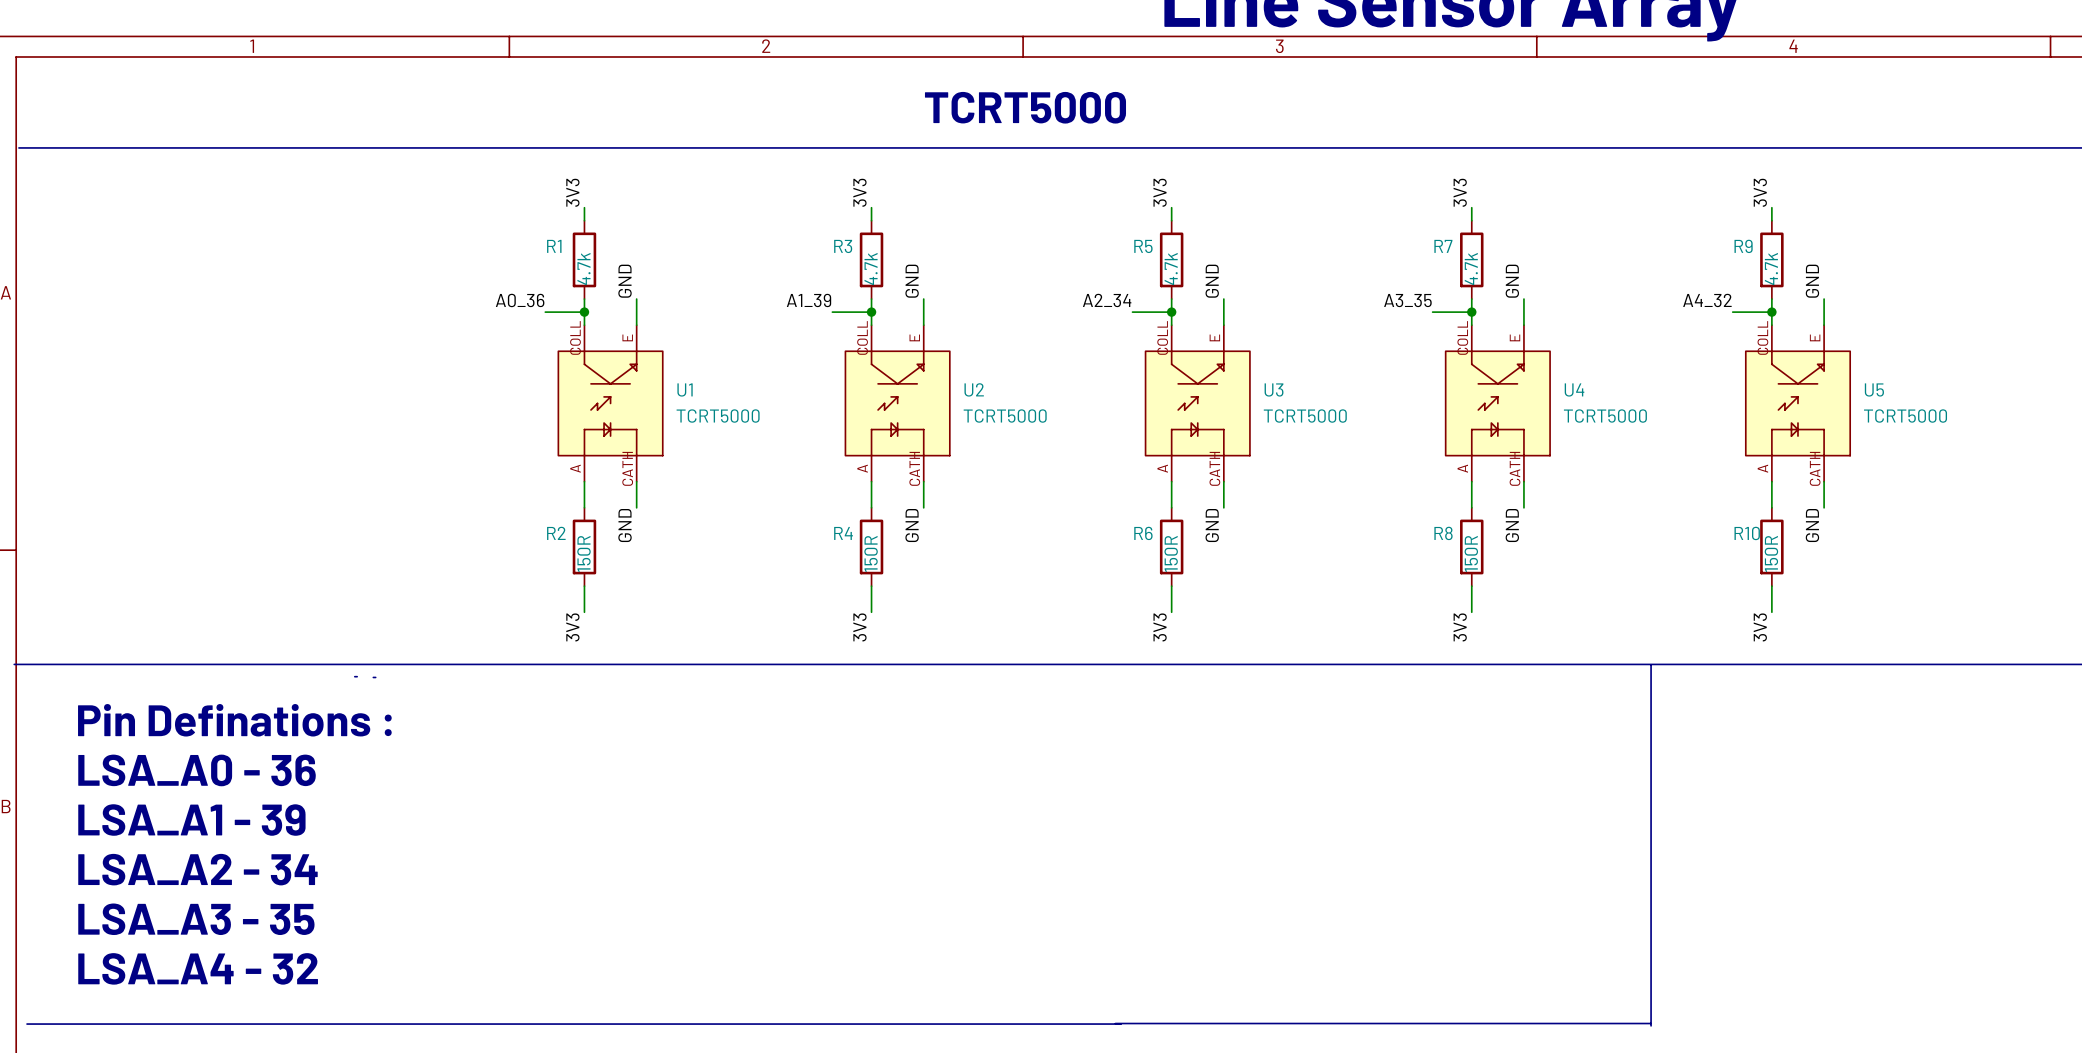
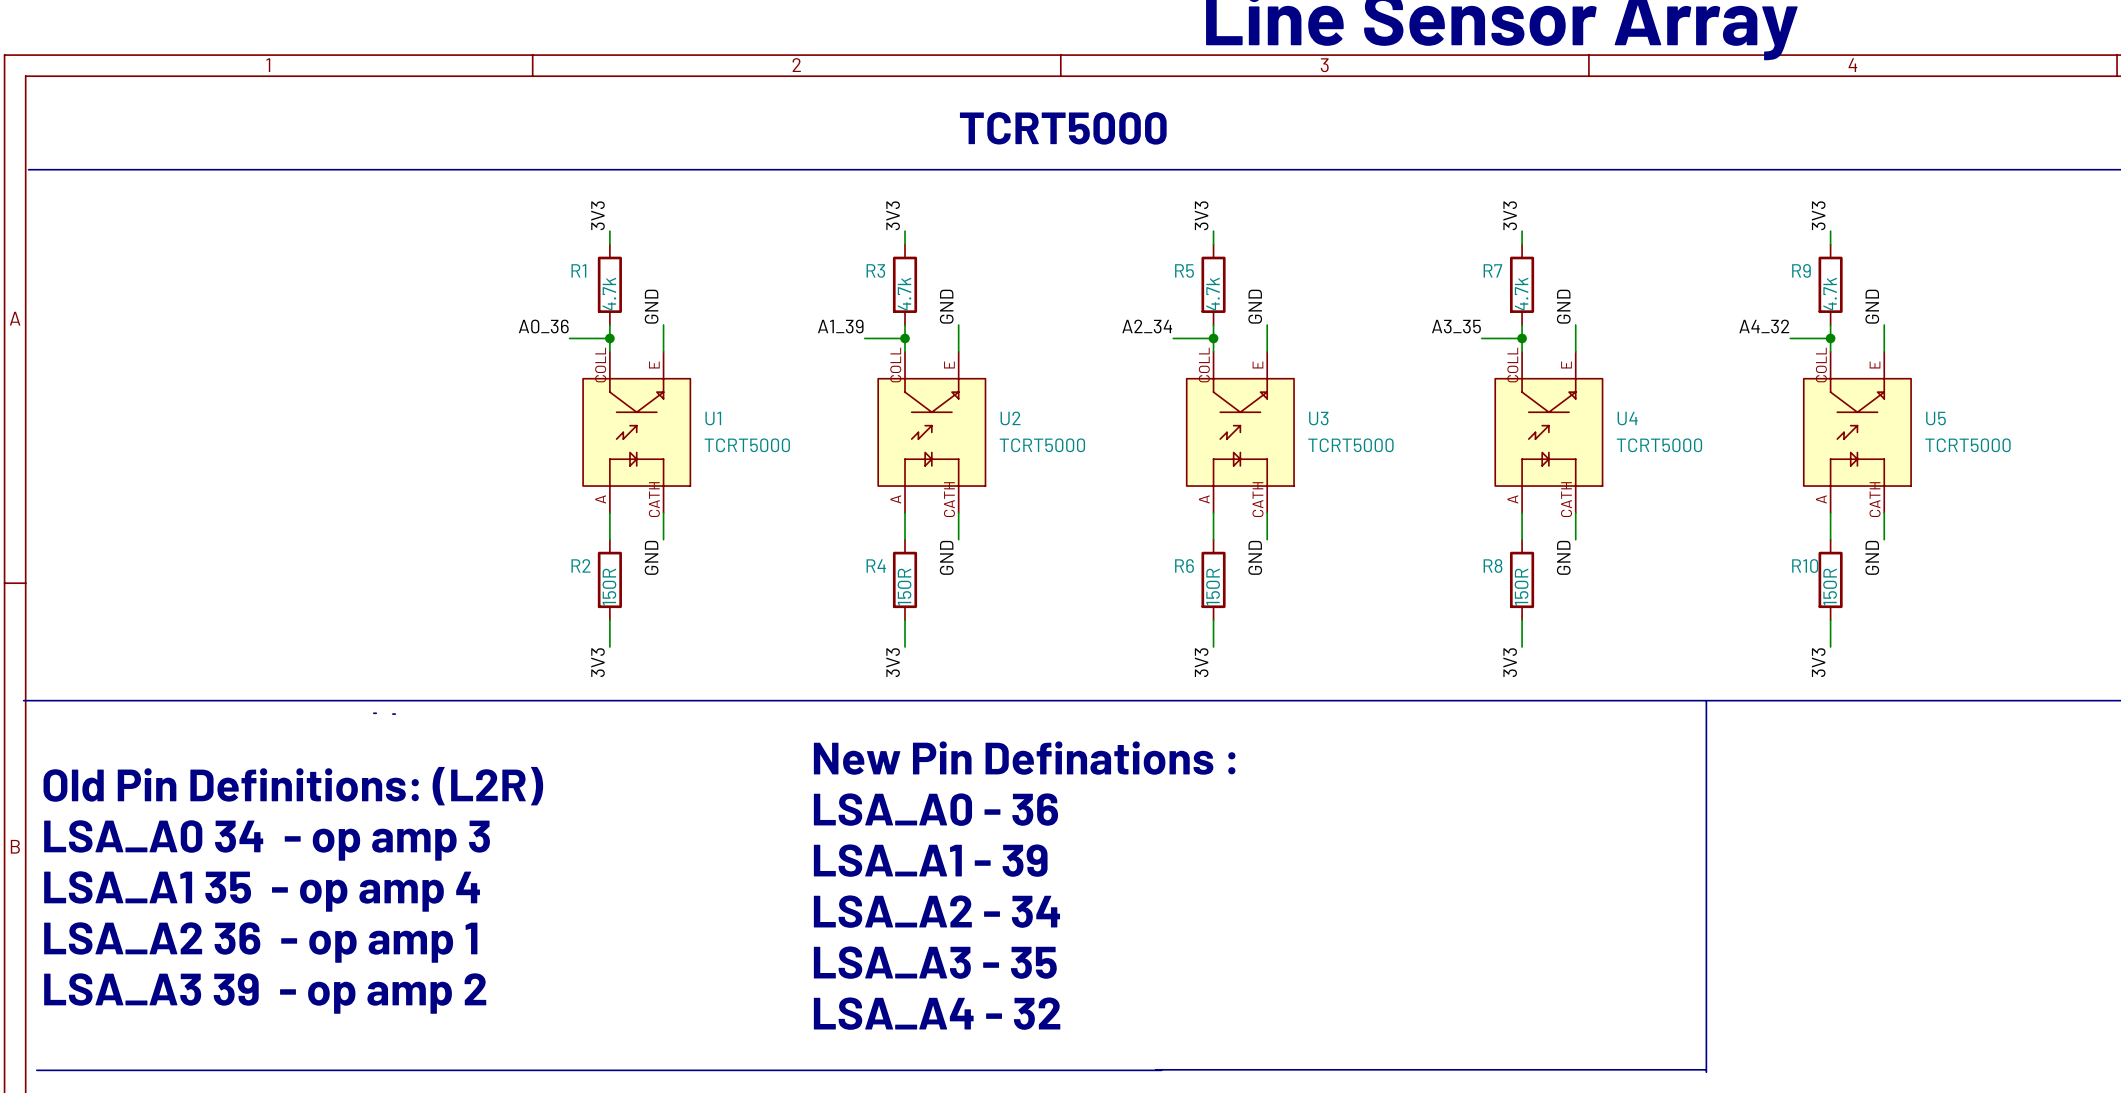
text: Pin Definations : (234, 720) -> Old Pin Definitions: (L2R) (293, 786)
text: none -> New Pin Definations : (1024, 758)
text: LSA_A0 - 36 (197, 770) -> LSA_A0 34 - op amp 3 (267, 840)
text: none -> LSA_A0 - 36 (935, 809)
text: LSA_A1 - 39 (191, 820) -> none
text: none -> LSA_A1 - 39 (930, 860)
text: none -> LSA_A1 35 - op amp 4 (262, 891)
text: LSA_A2 - 34 (197, 869) -> none
text: none -> LSA_A2 - 34 (936, 911)
text: none -> LSA_A2 36 - op amp 1 (260, 942)
text: LSA_A3 - 35 (196, 919) -> none
text: none -> LSA_A3 - 35 (935, 962)
text: none -> LSA_A3 39 - op amp 2 (265, 993)
text: LSA_A4 - 32 (198, 968) -> none
text: none -> LSA_A4 - 32 (937, 1013)

